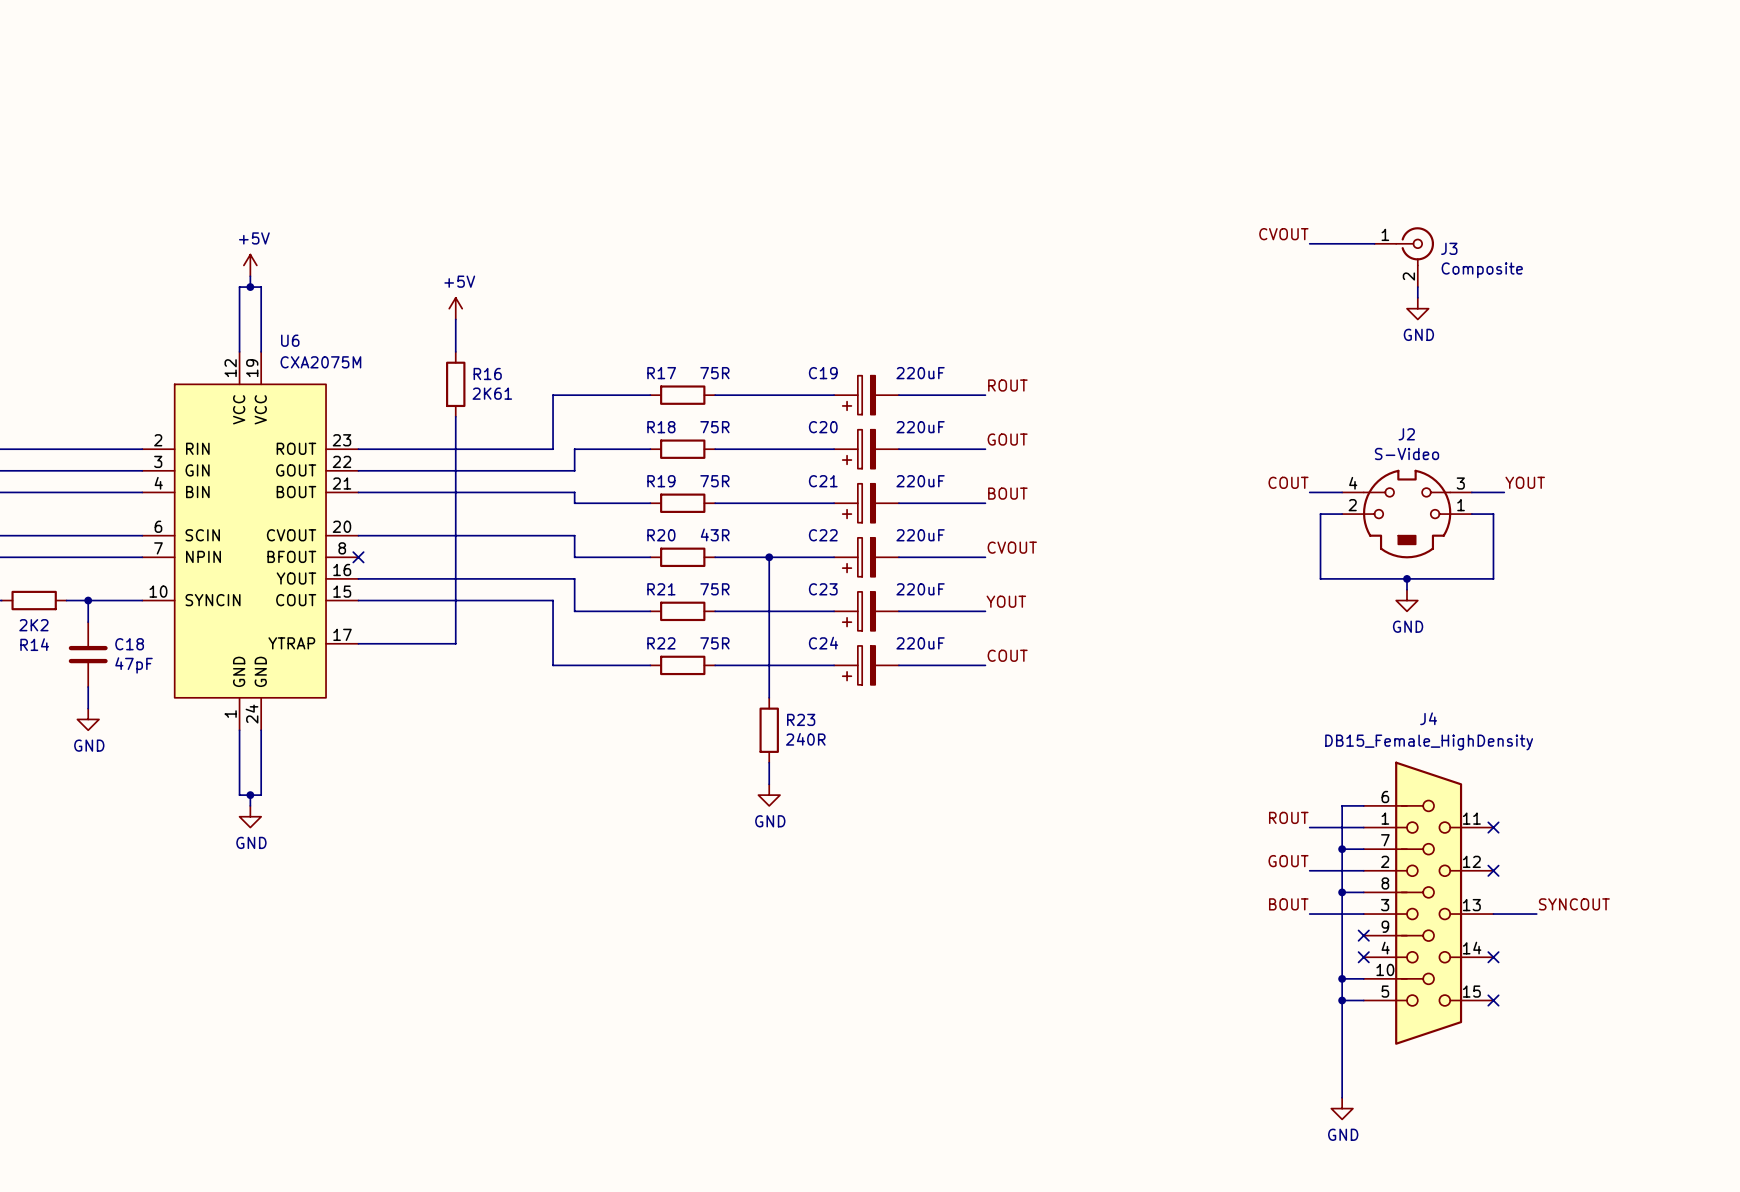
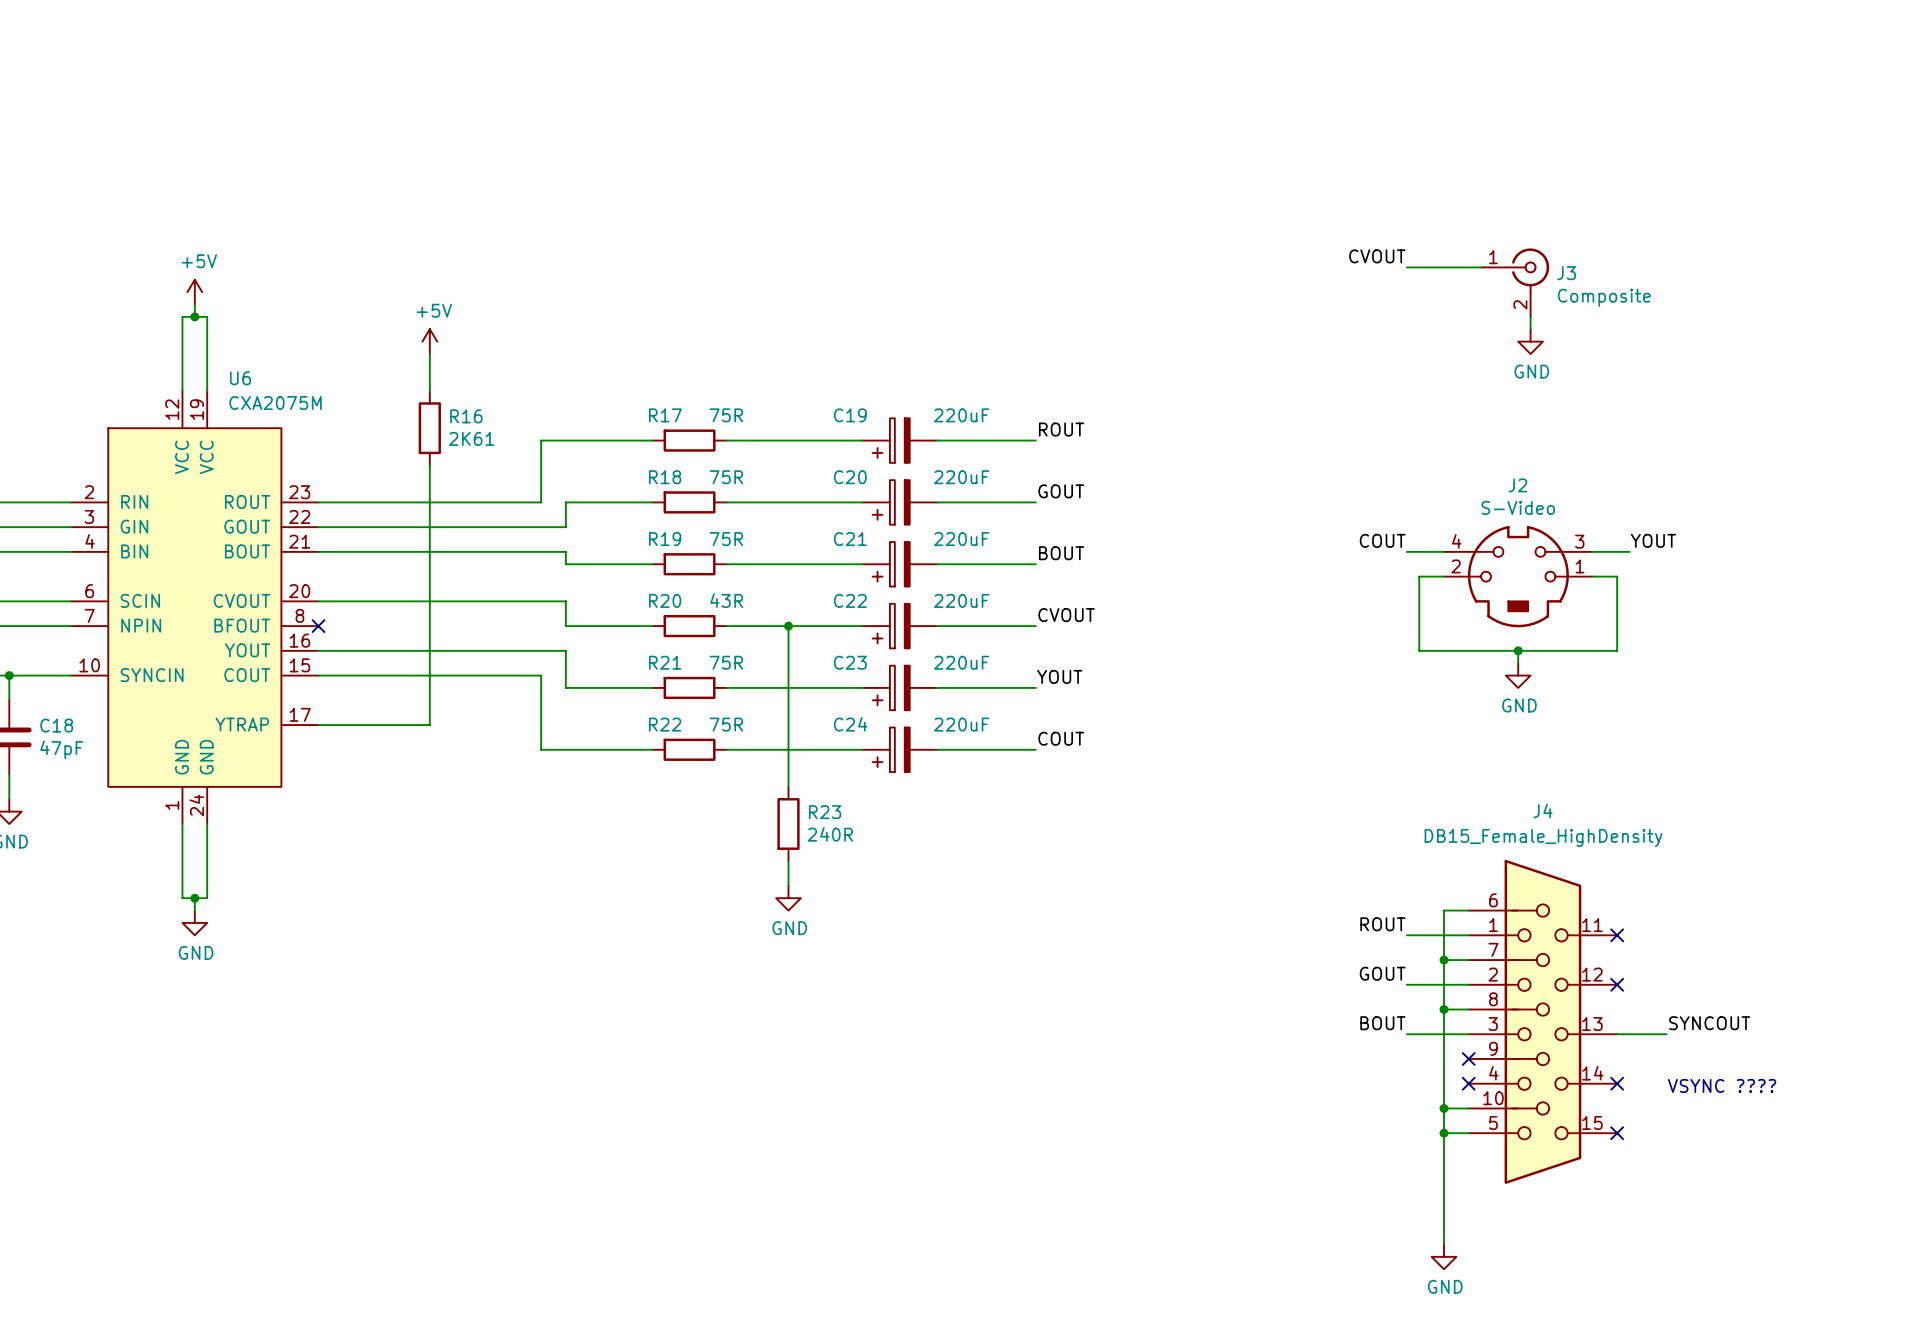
text: none -> VSYNC ???? (1722, 1085)

